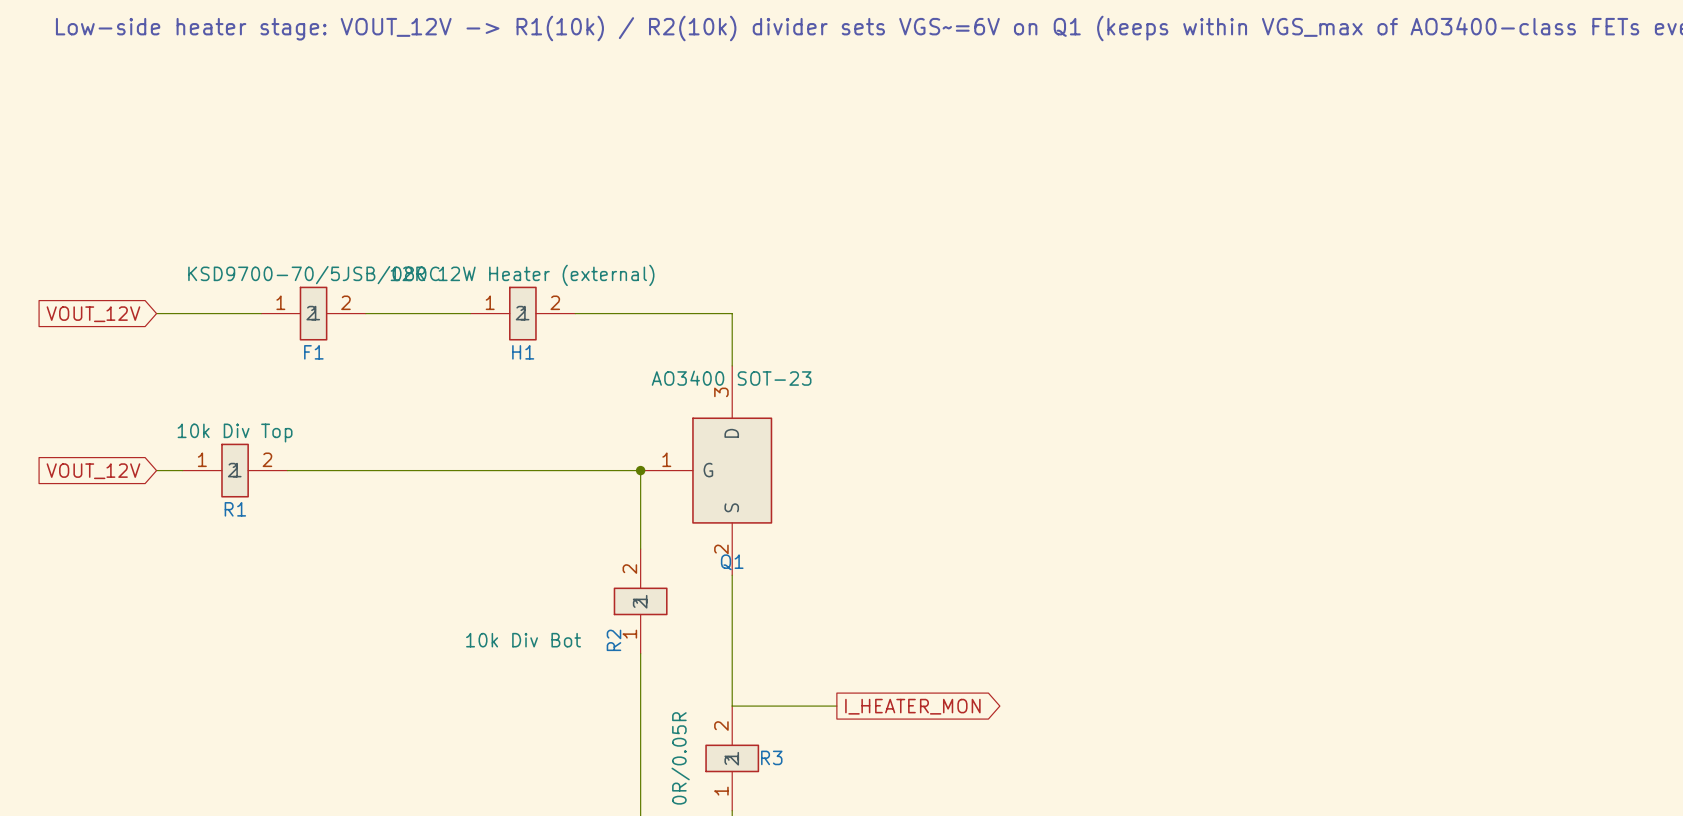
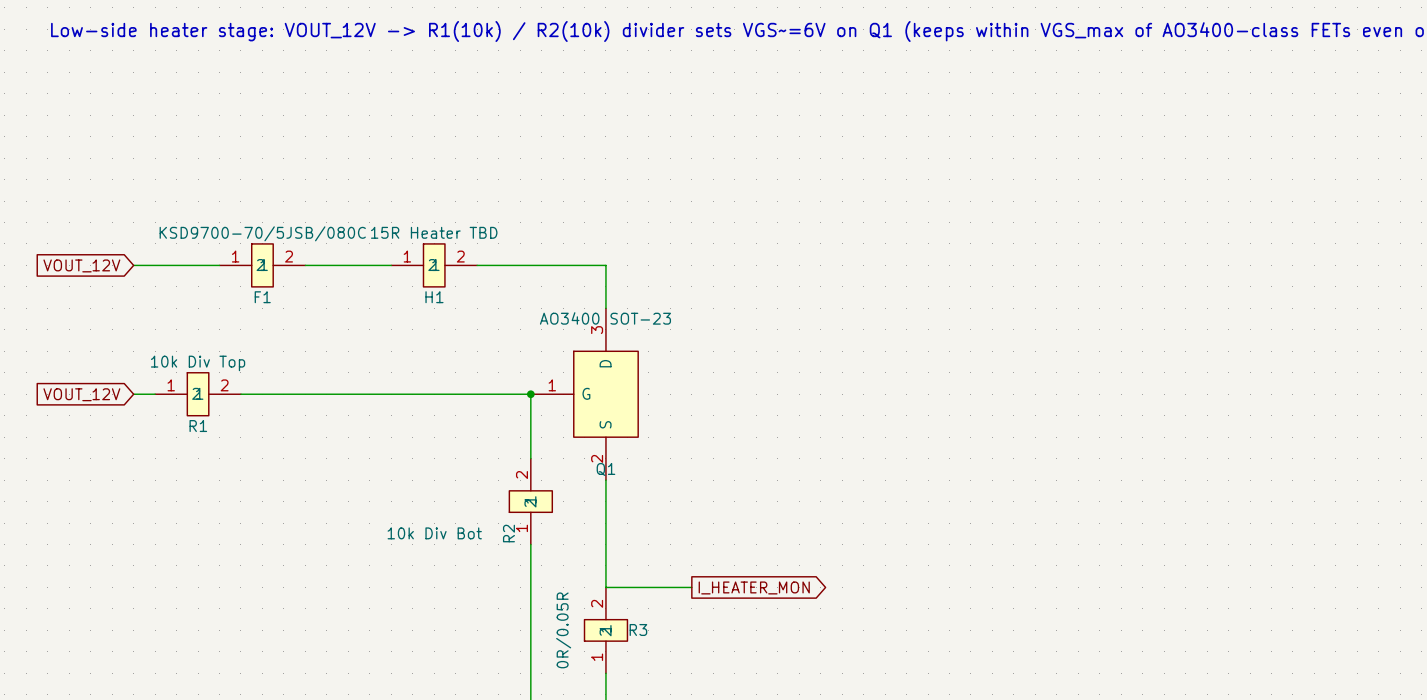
H1 value: 12R 12W Heater (external) (522, 275) -> 15R Heater TBD (434, 232)

